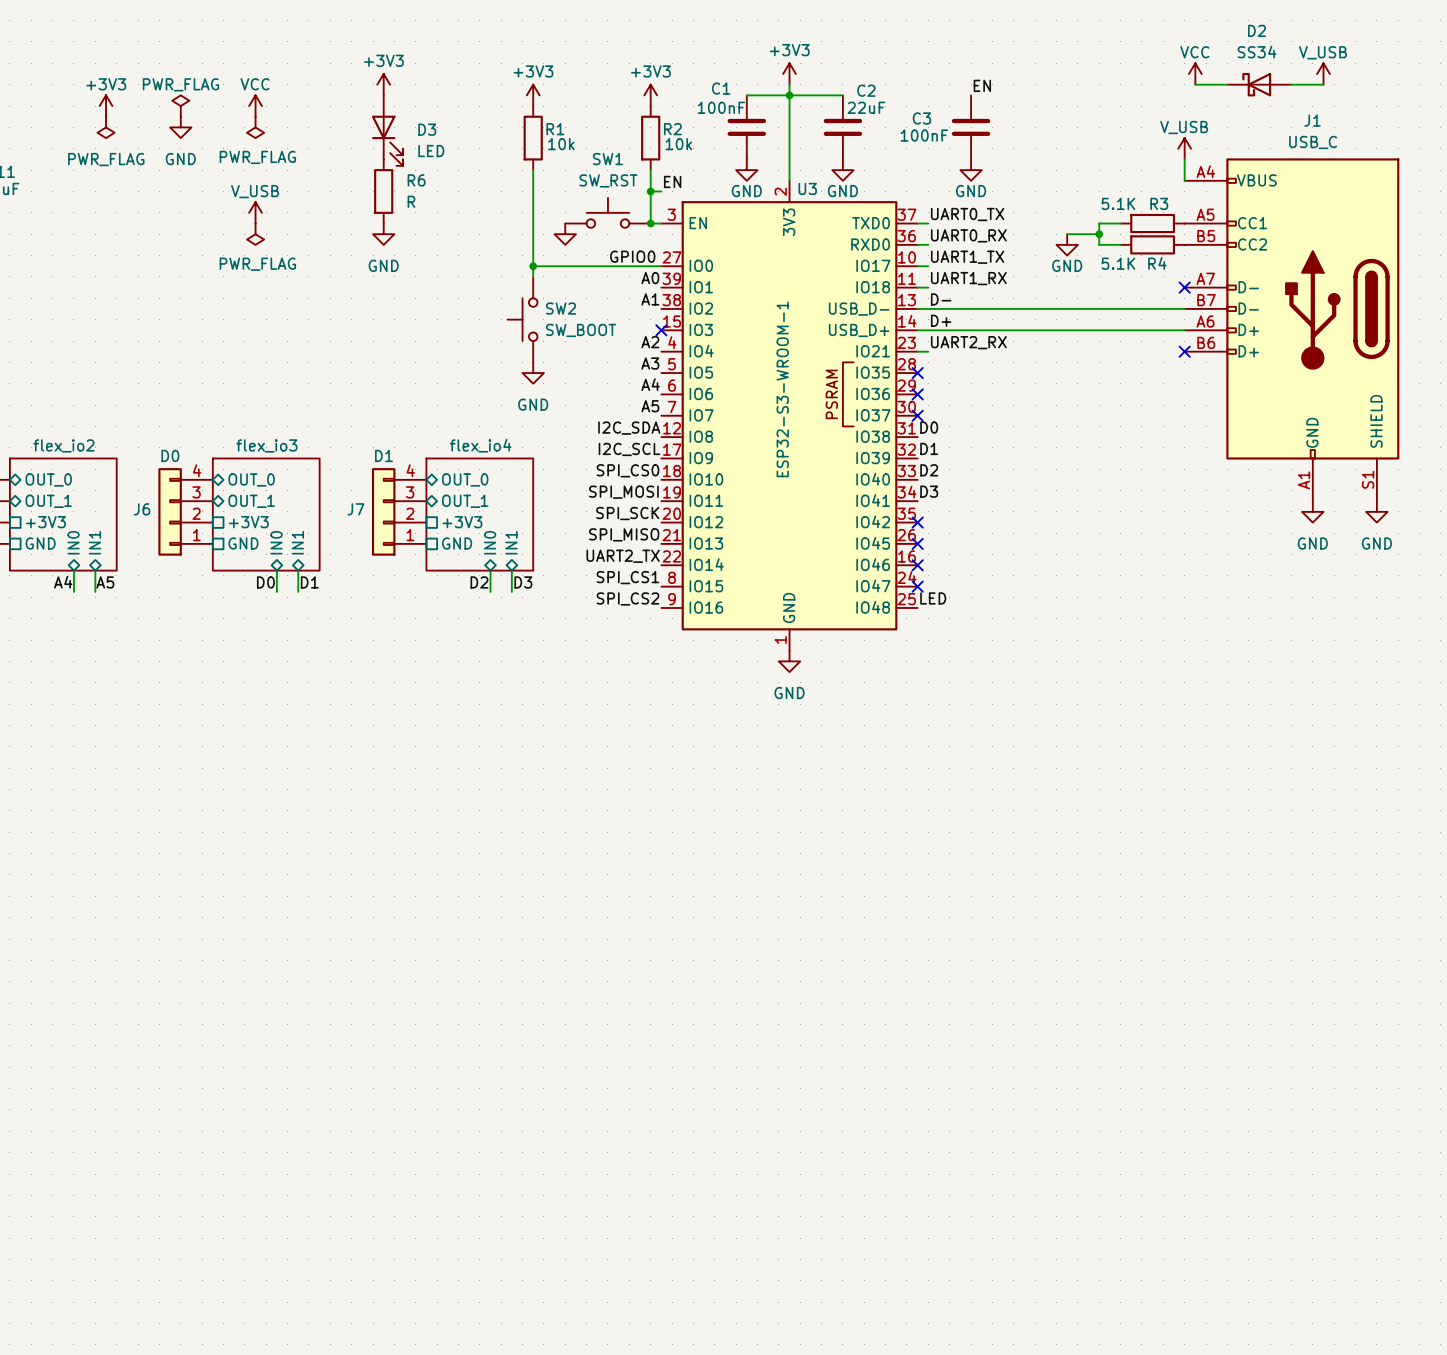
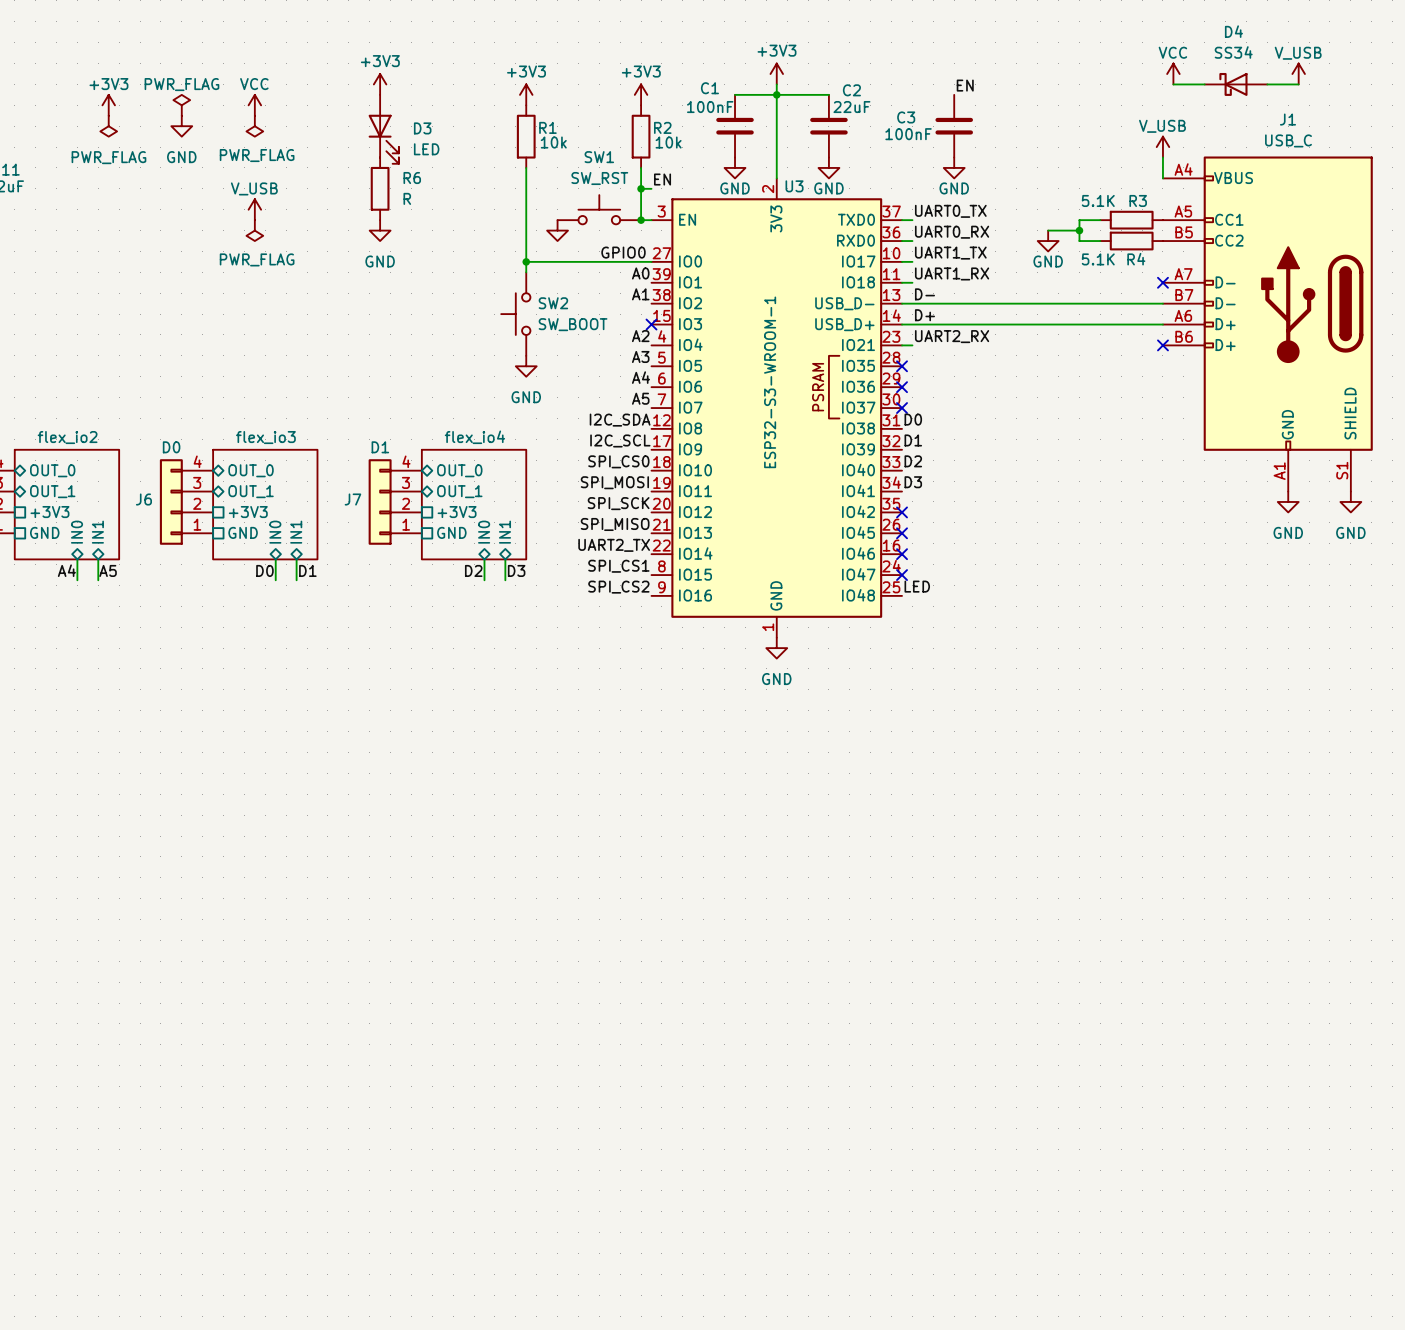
D2 name: D2 (1257, 30) -> D4 (1233, 31)

